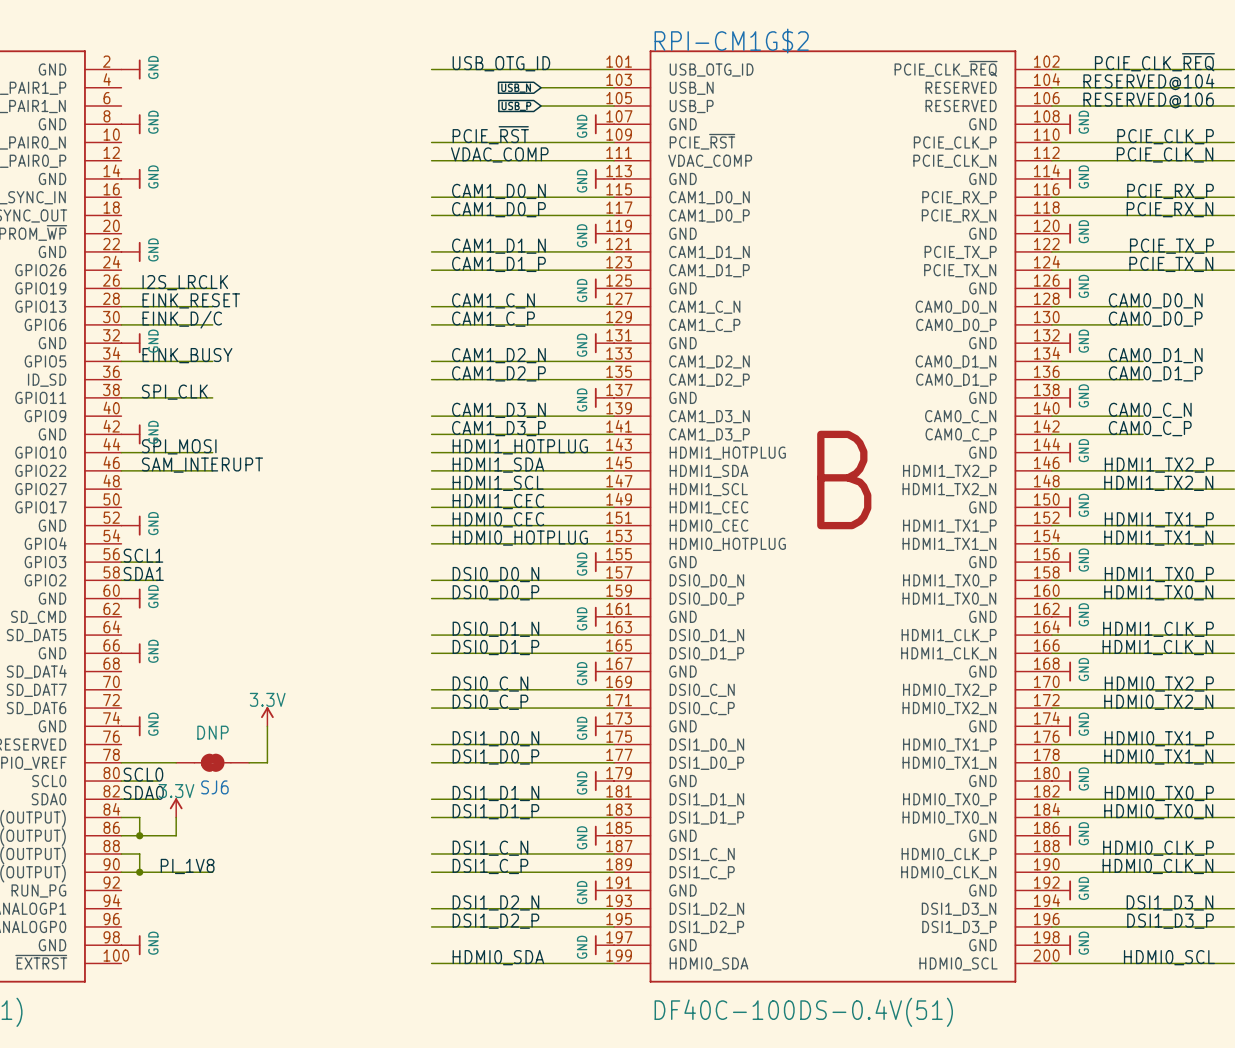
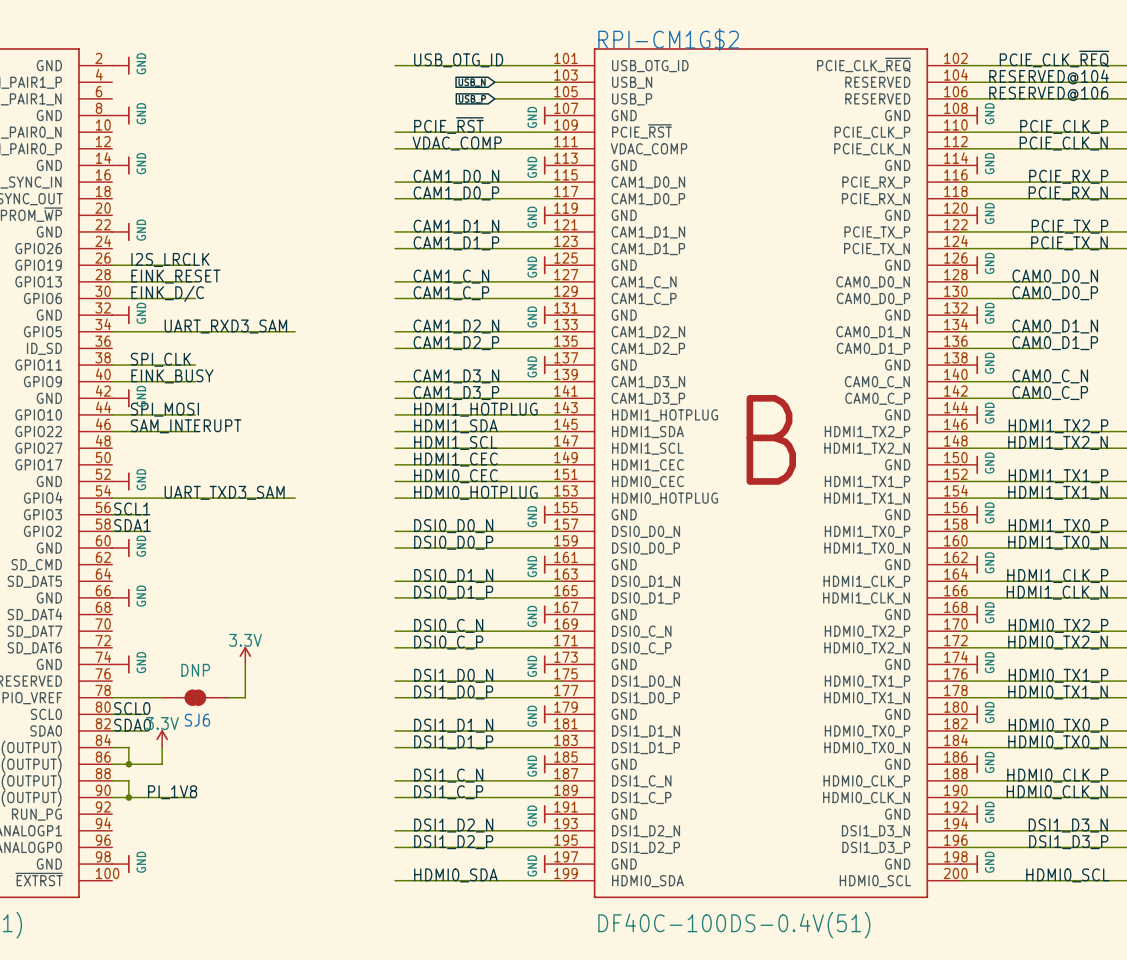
label position: EINK_BUSY (187, 355) -> EINK_BUSY (172, 376)
label: none -> UART_RXD3_SAM (225, 326)
wire: none -> (195, 331) (295, 331)
wire: none -> (112, 381) (195, 381)
label: none -> UART_TXD3_SAM (224, 492)
wire: none -> (112, 498) (295, 498)

